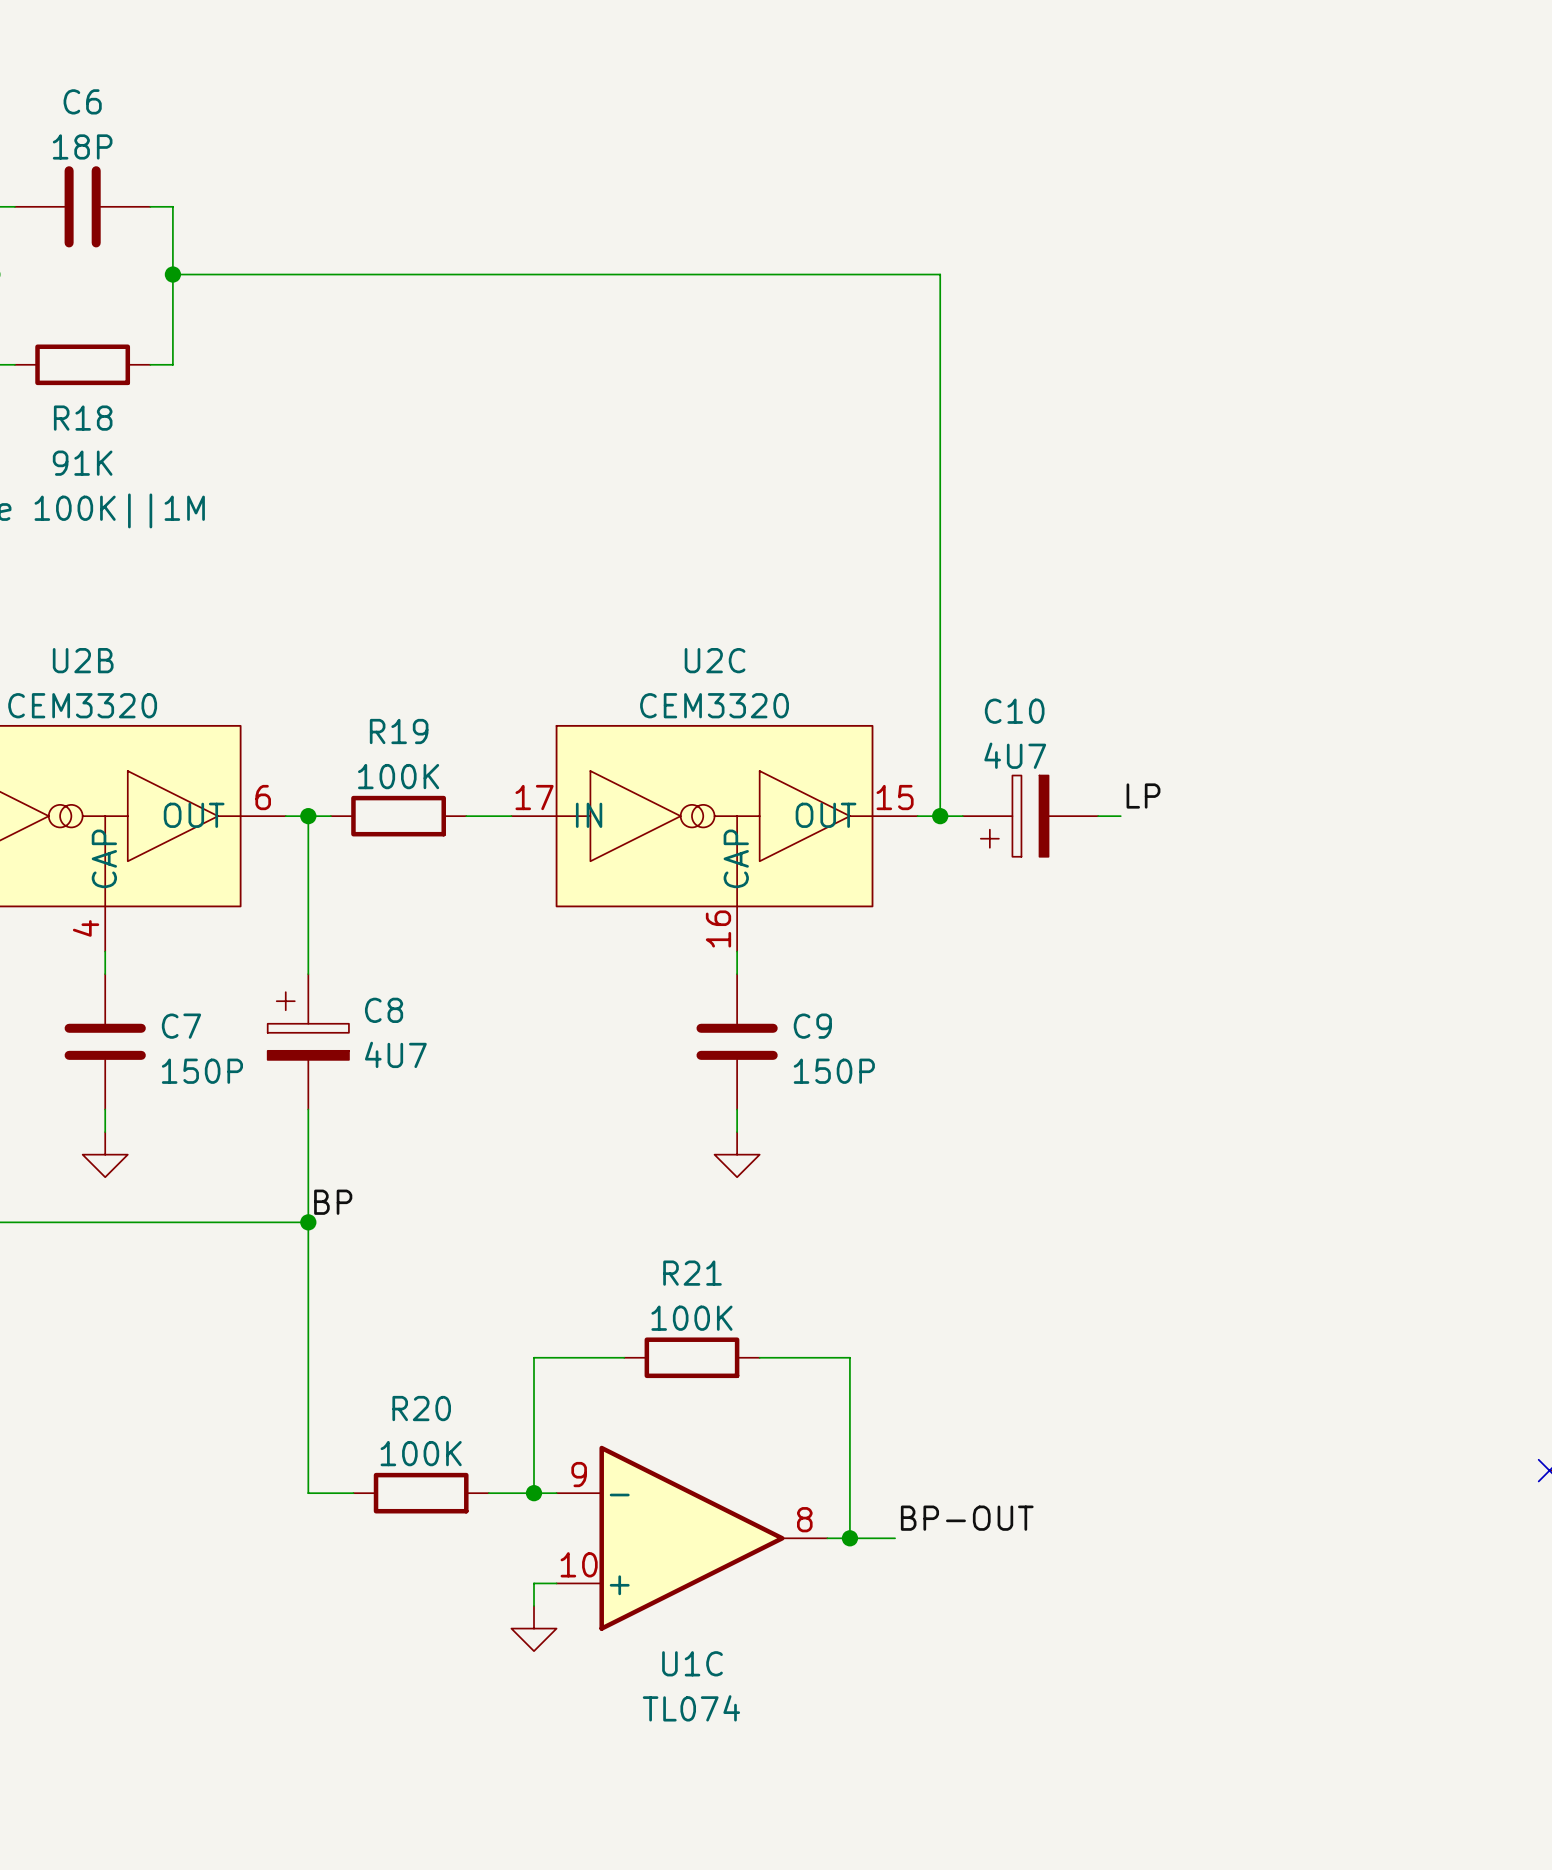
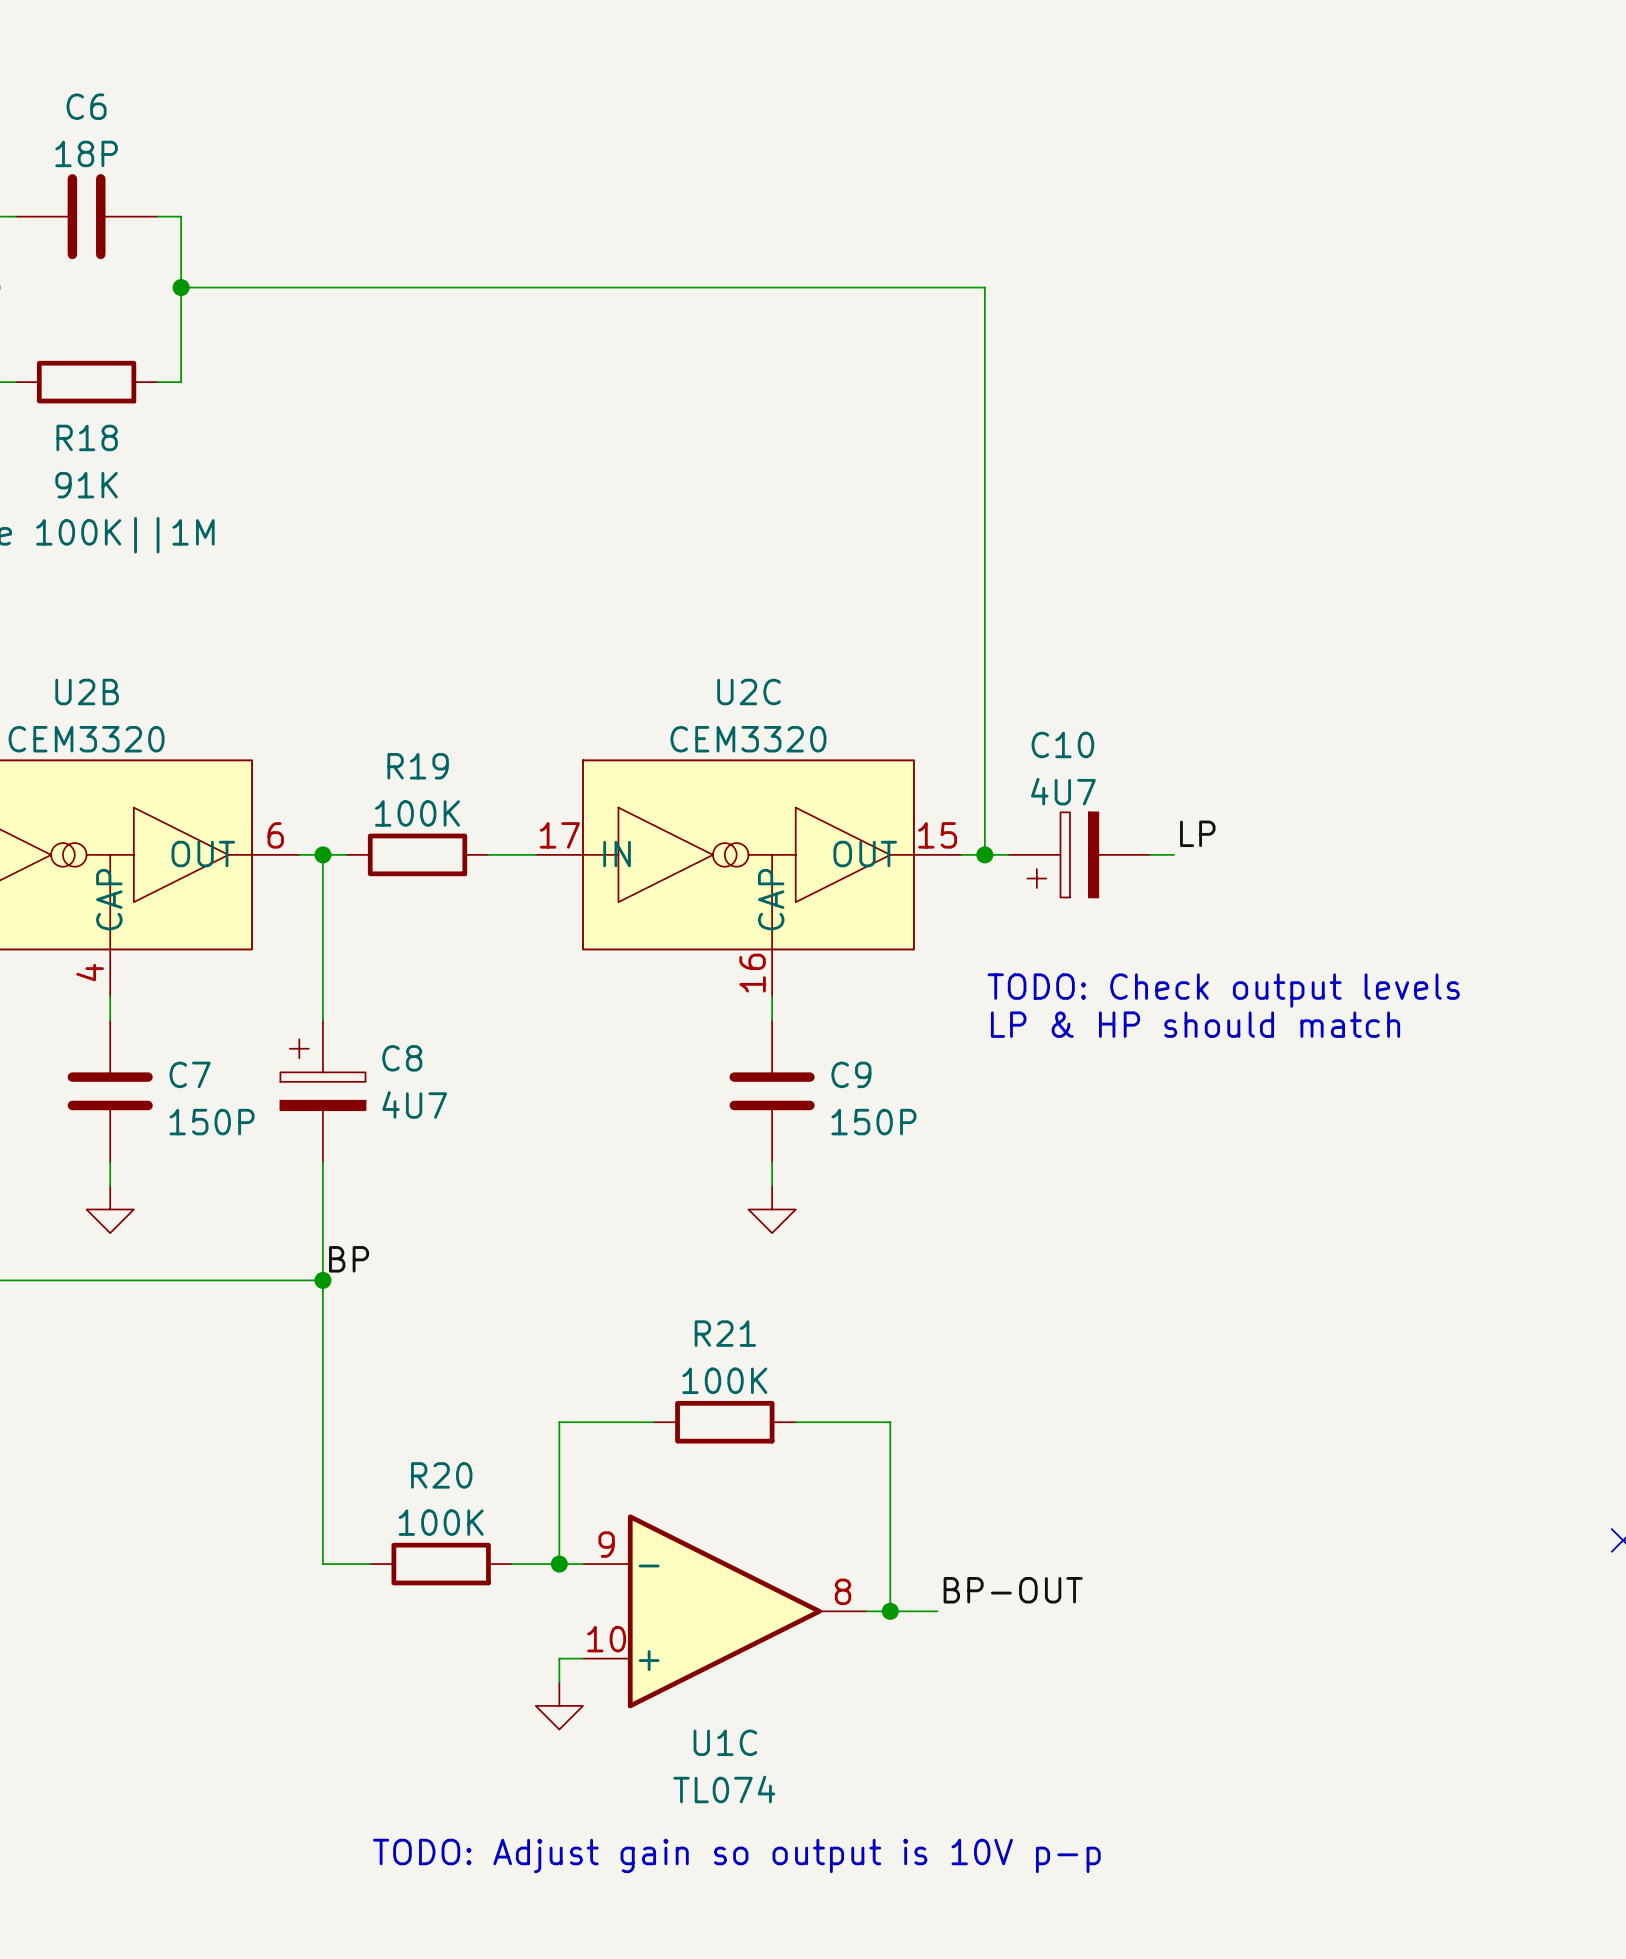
text: none -> TODO: Check output levels (1223, 990)
text: none -> LP & HP should match (1195, 1024)
text: none -> TODO: Adjust gain so output is 10V p-p (736, 1855)

